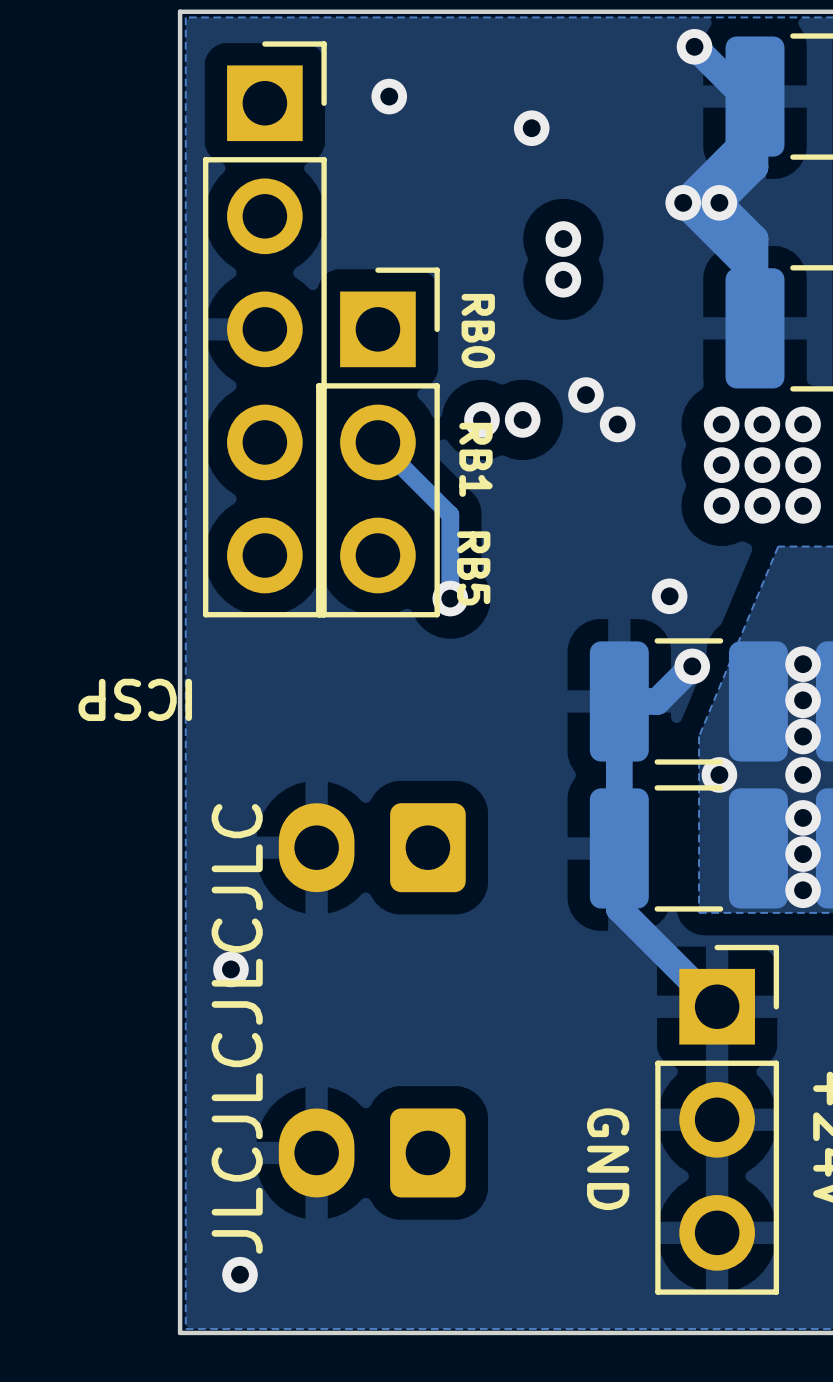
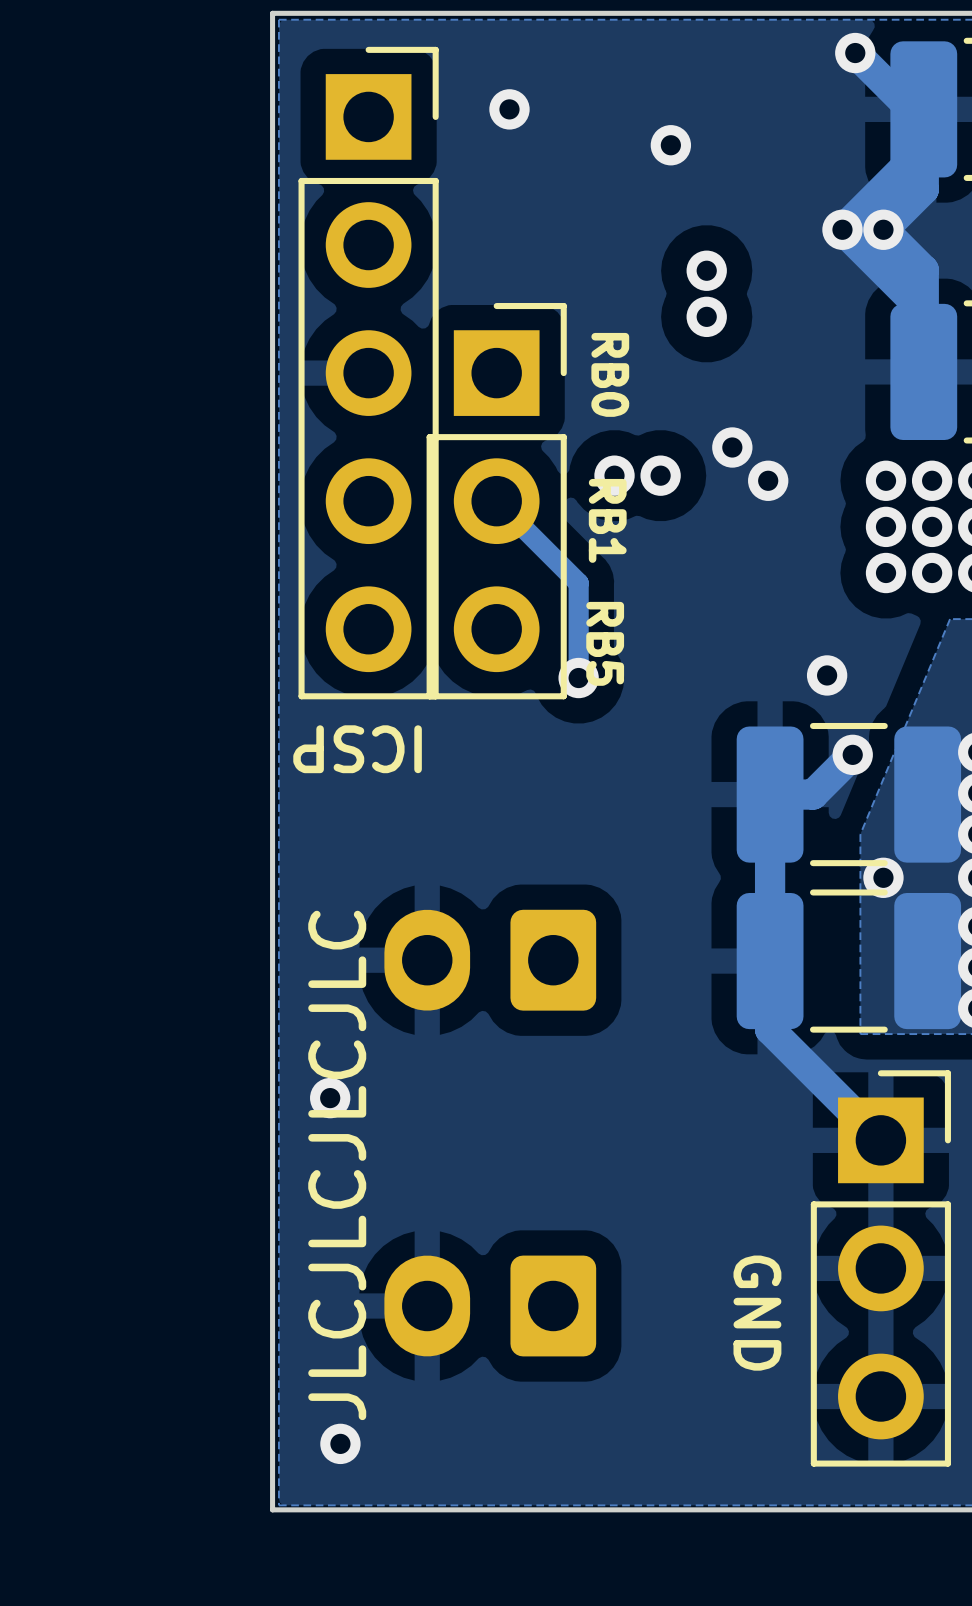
text position: ICSP (135, 699) -> ICSP (357, 749)

